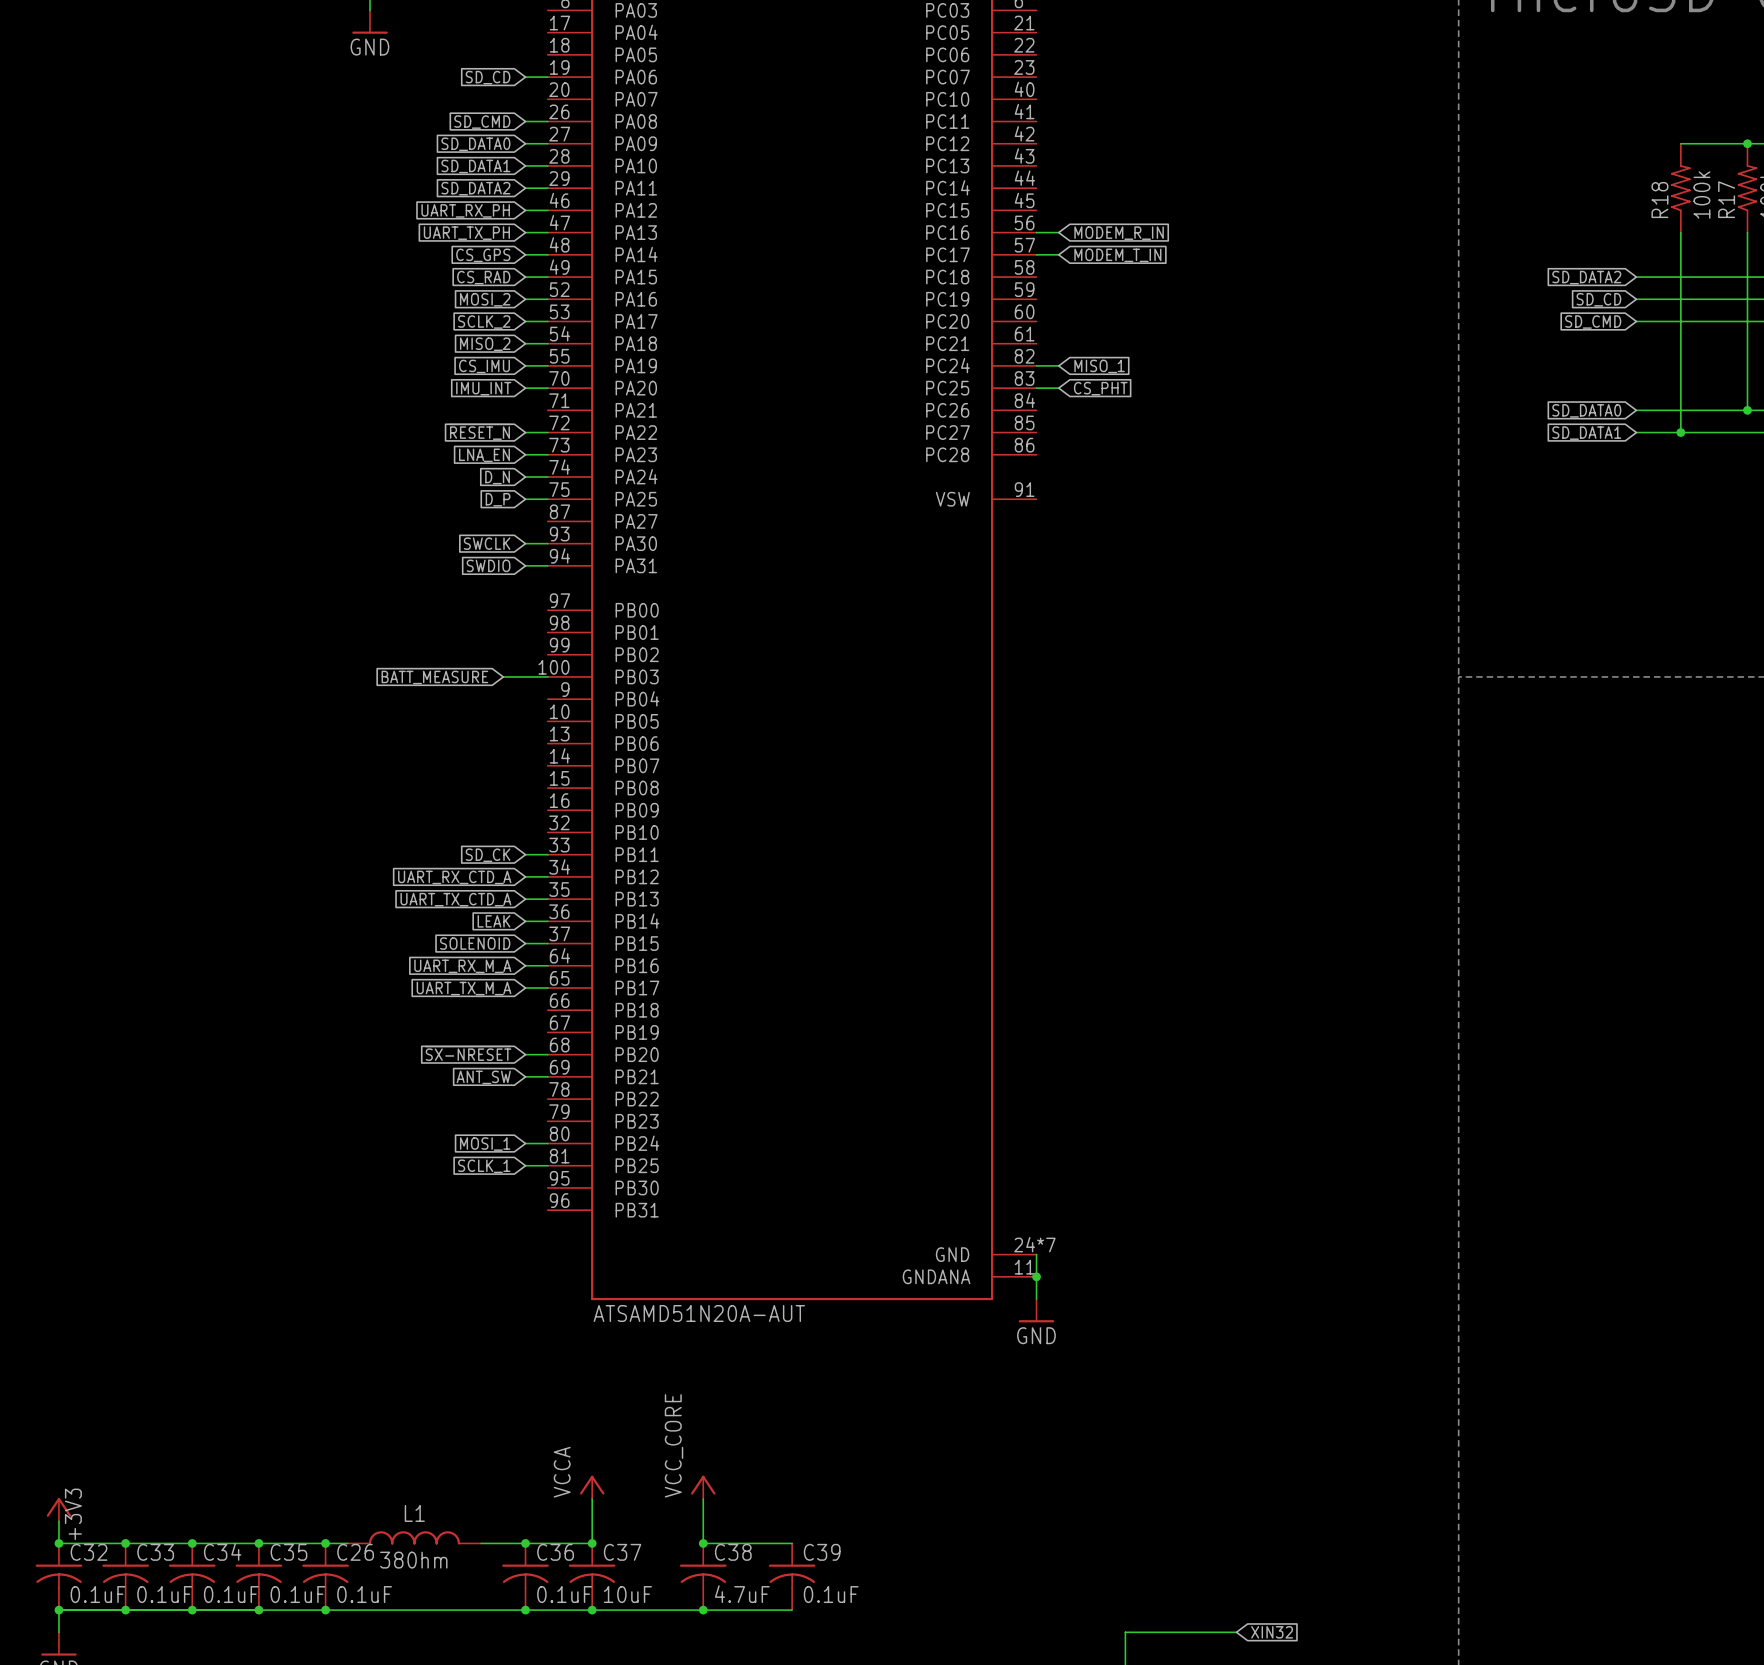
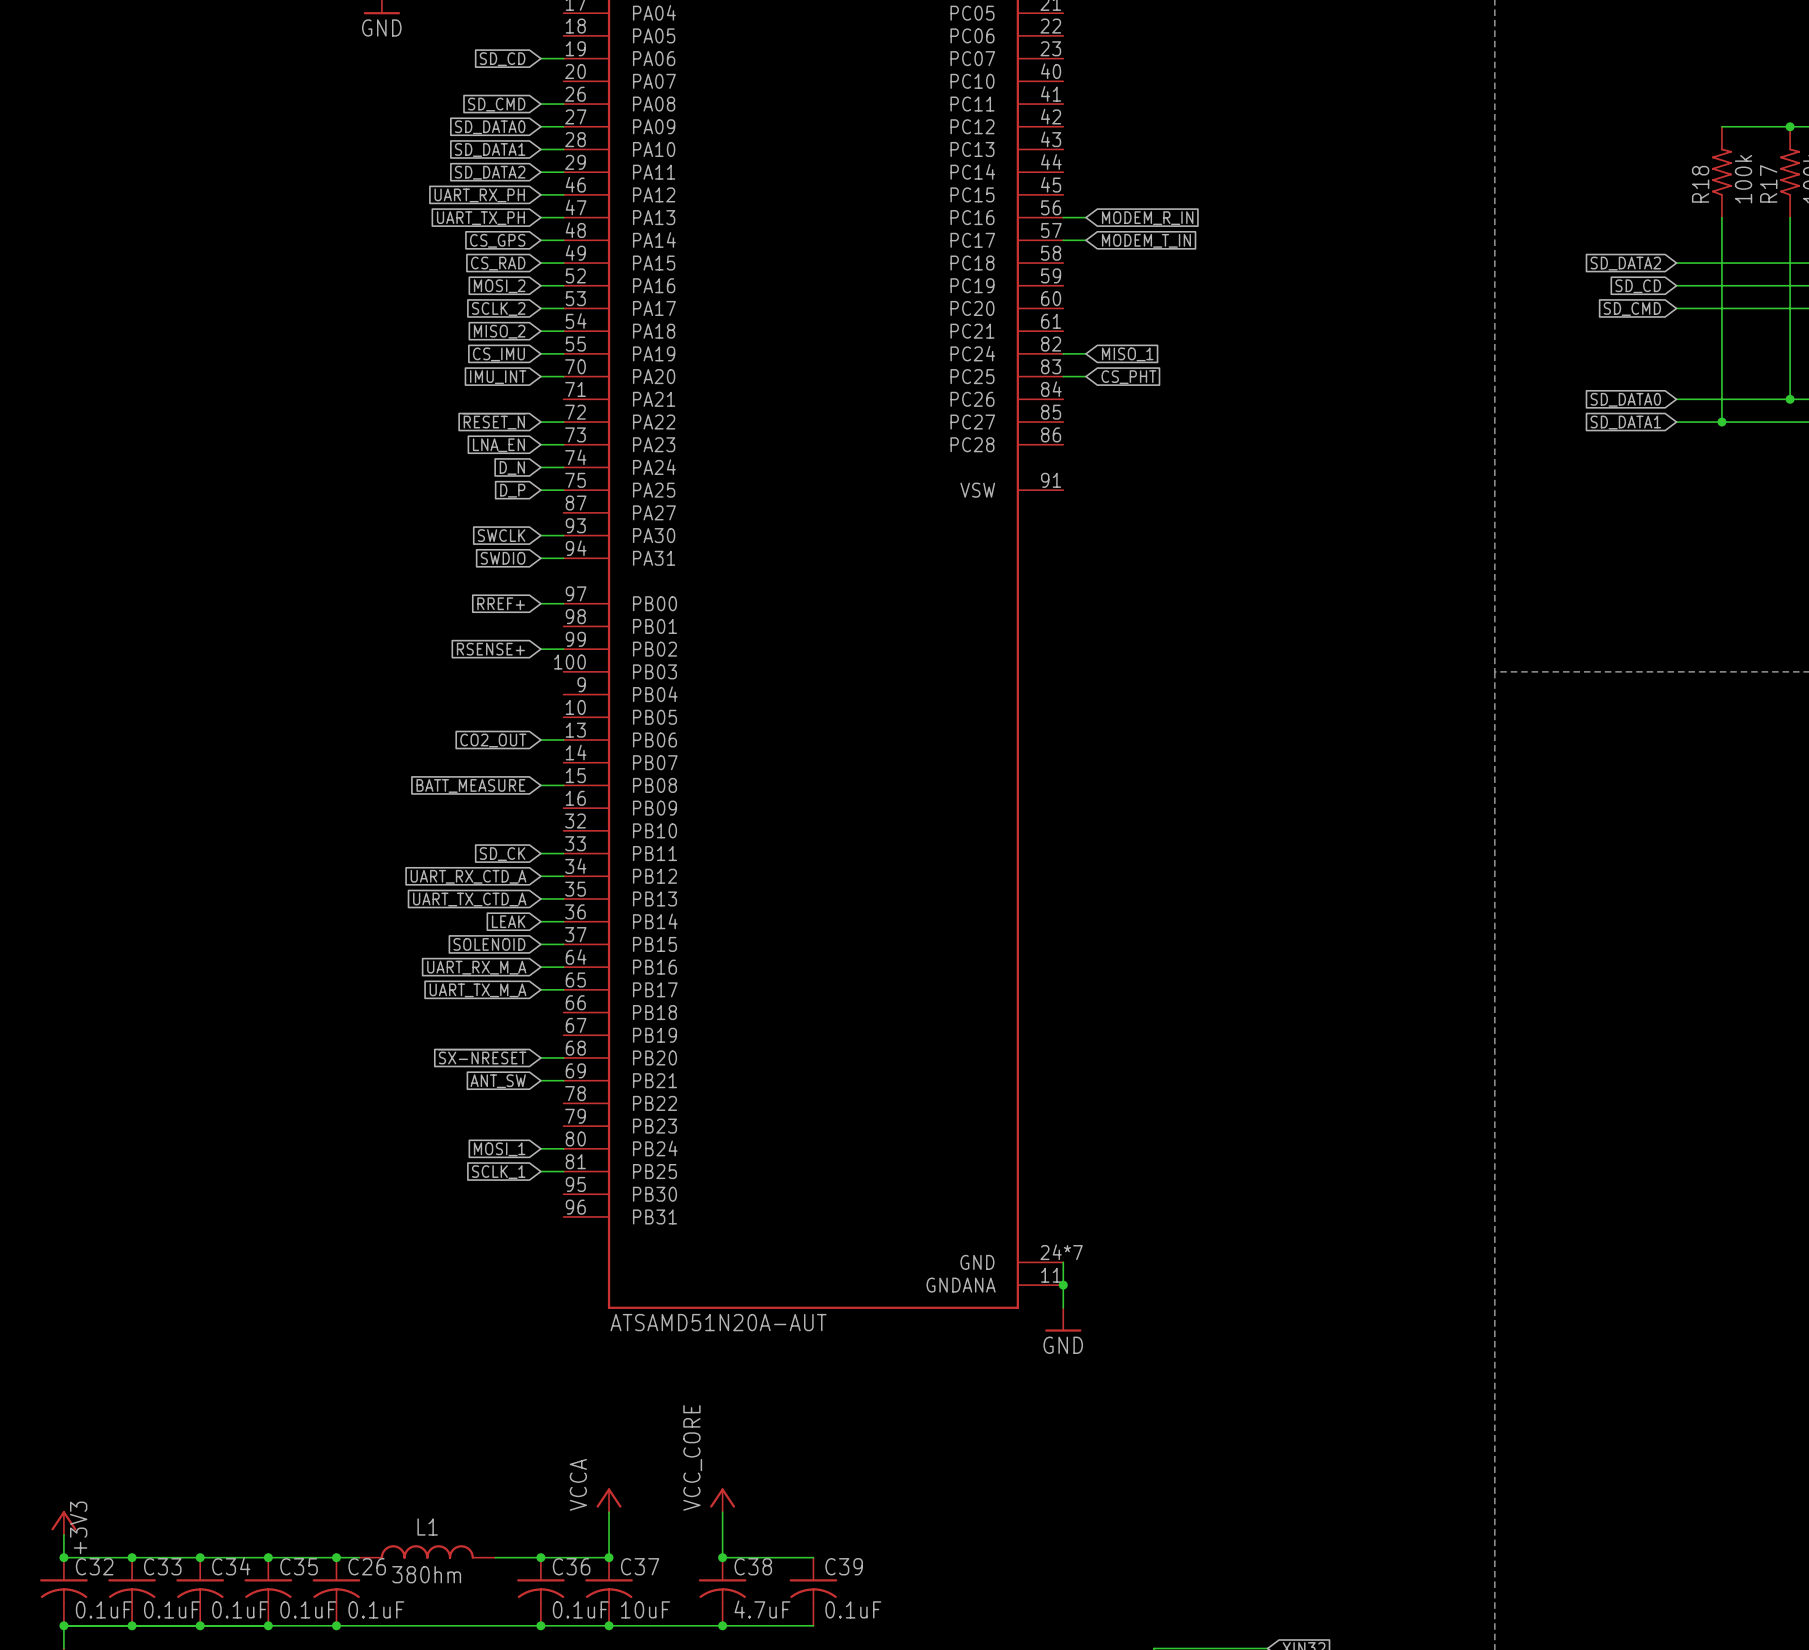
global label: none -> RREF+ (501, 603)
wire: none -> (540, 603) (563, 603)
global label: none -> RSENSE+ (490, 649)
wire: none -> (540, 649) (563, 649)
wire: (503, 676) (547, 676) -> none
global label position: BATT_MEASURE (434, 677) -> BATT_MEASURE (470, 785)
wire: none -> (540, 740) (563, 740)
global label: none -> CO2_OUT (493, 740)
wire: none -> (540, 785) (563, 785)

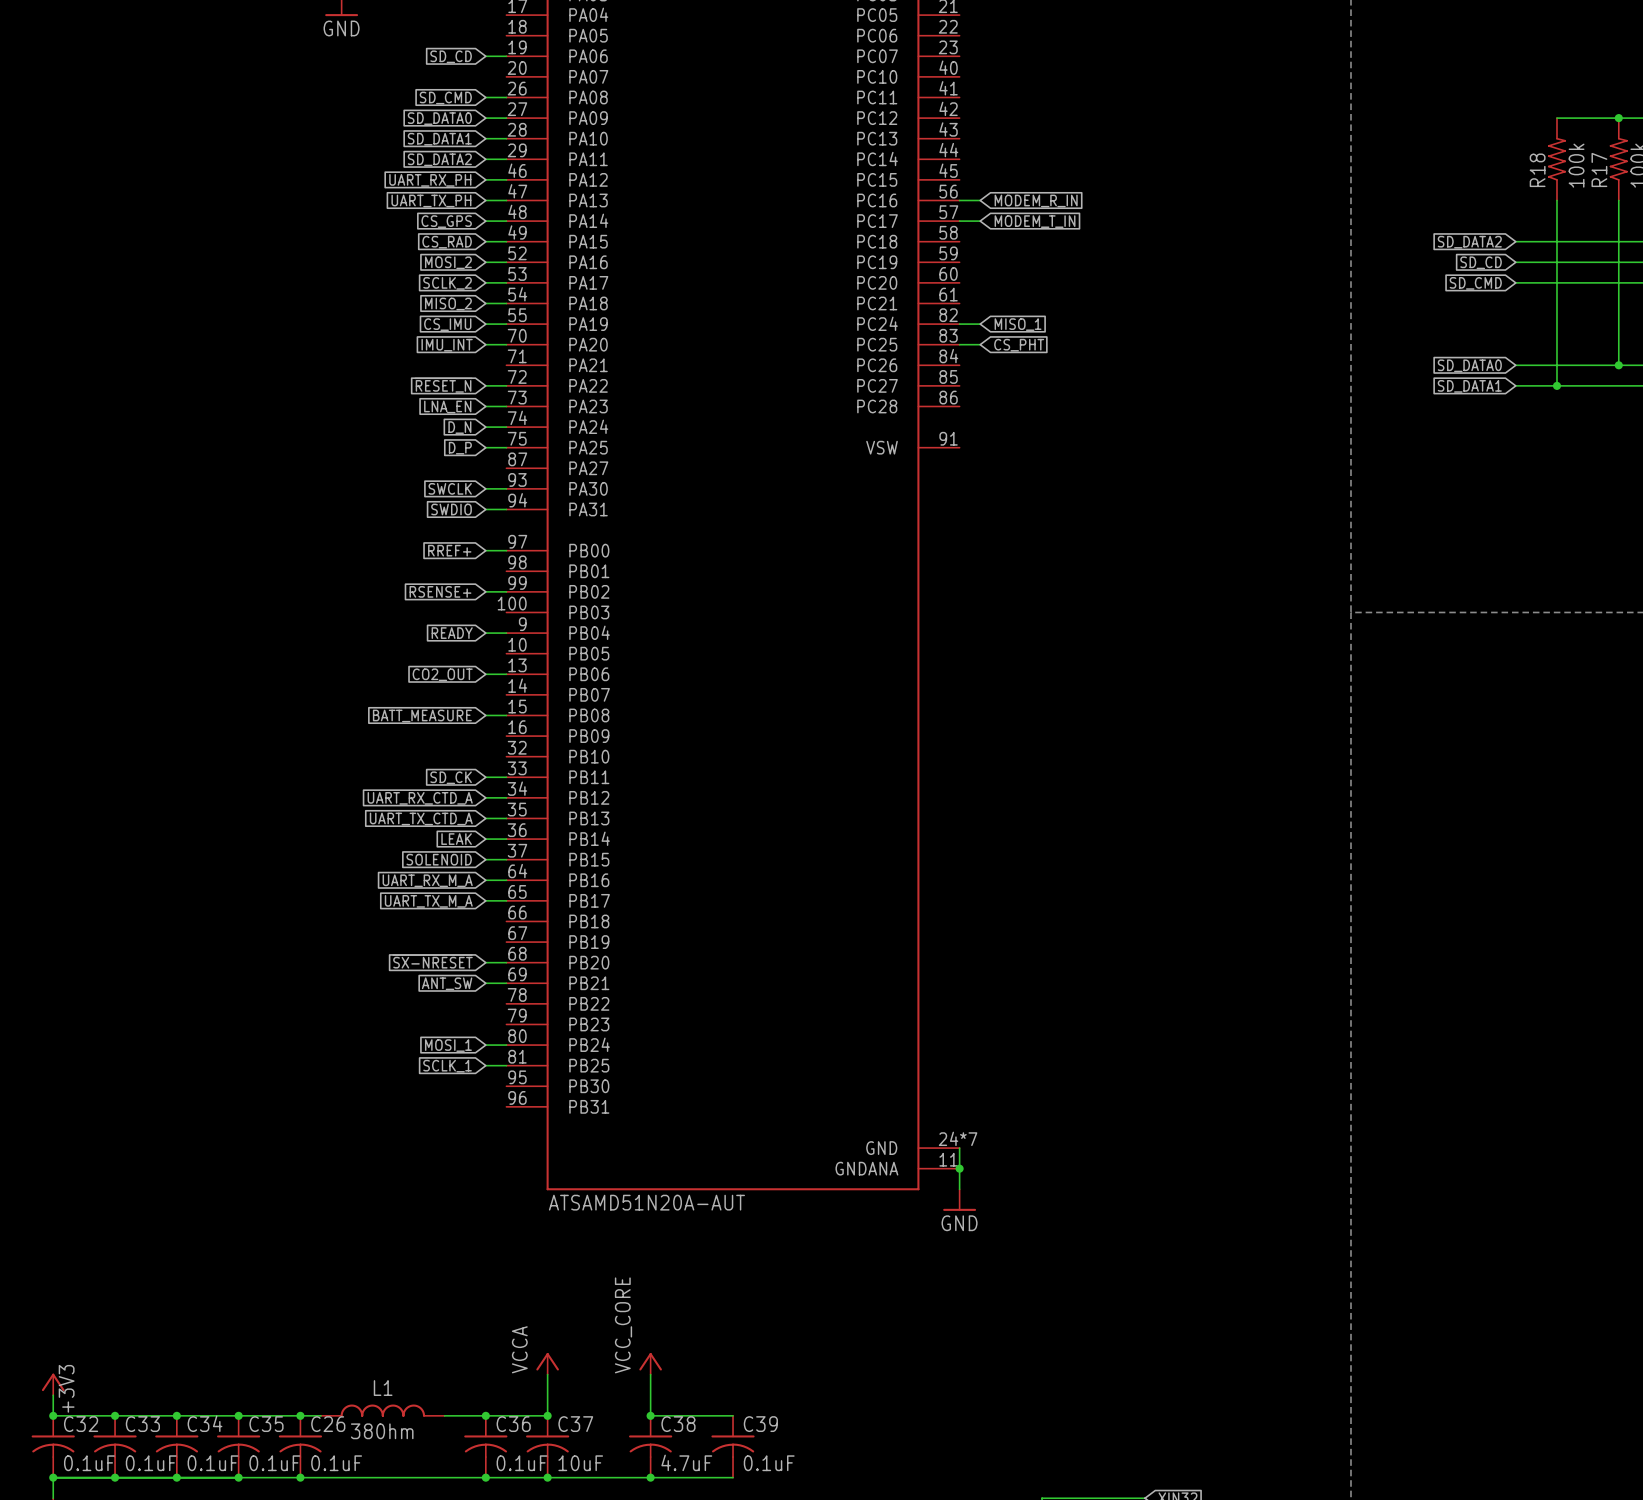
global label: none -> READY (452, 633)
wire: none -> (485, 633) (506, 633)

